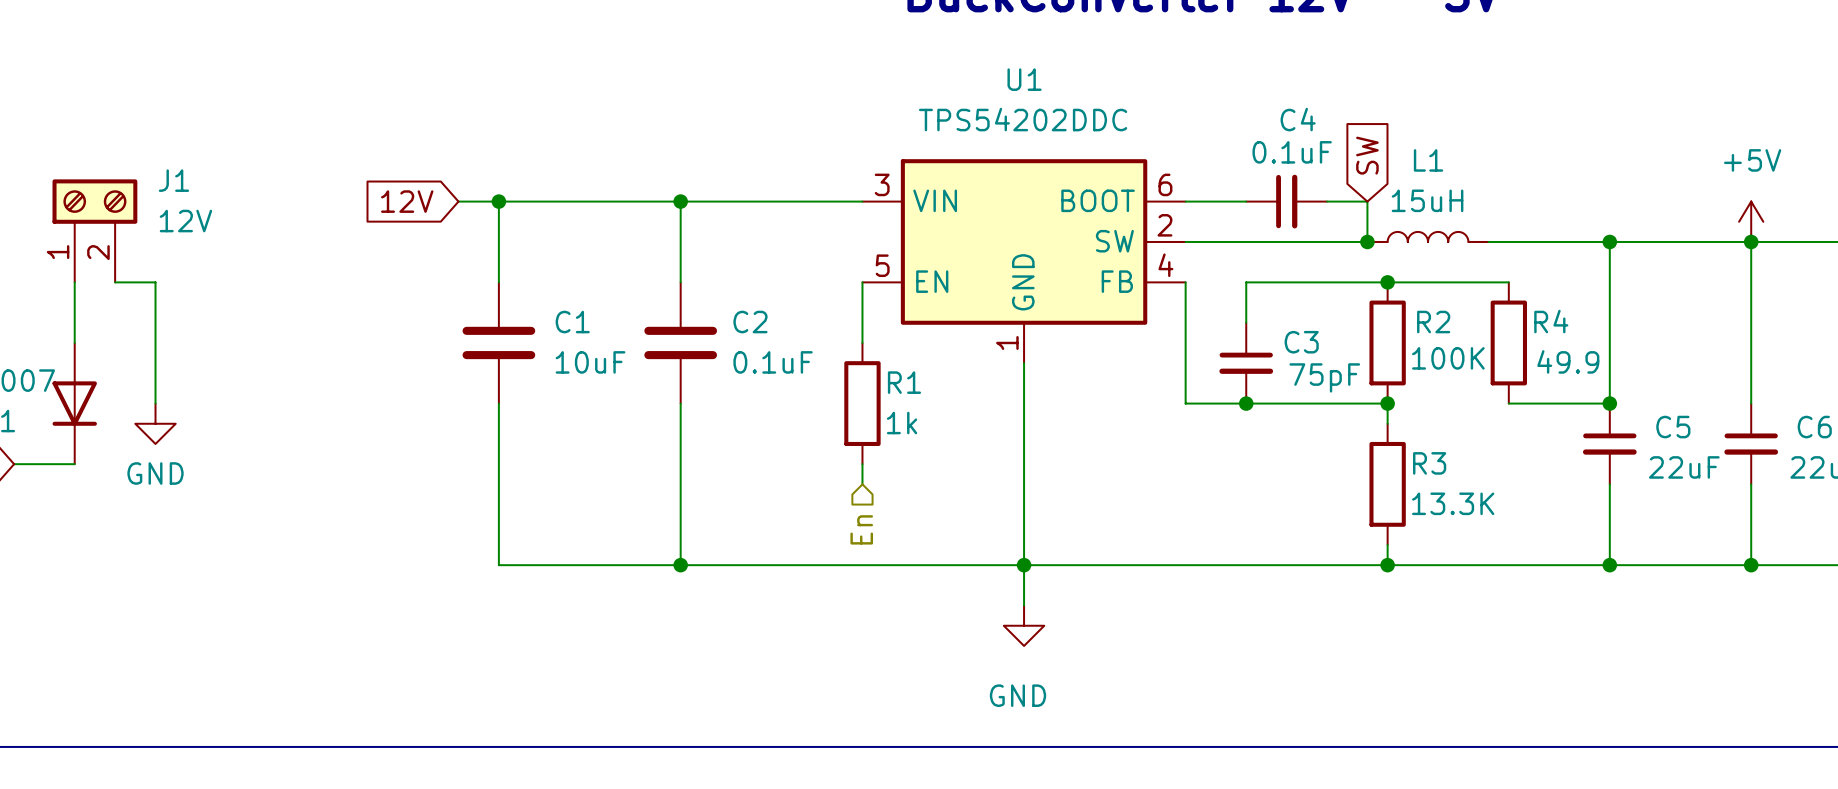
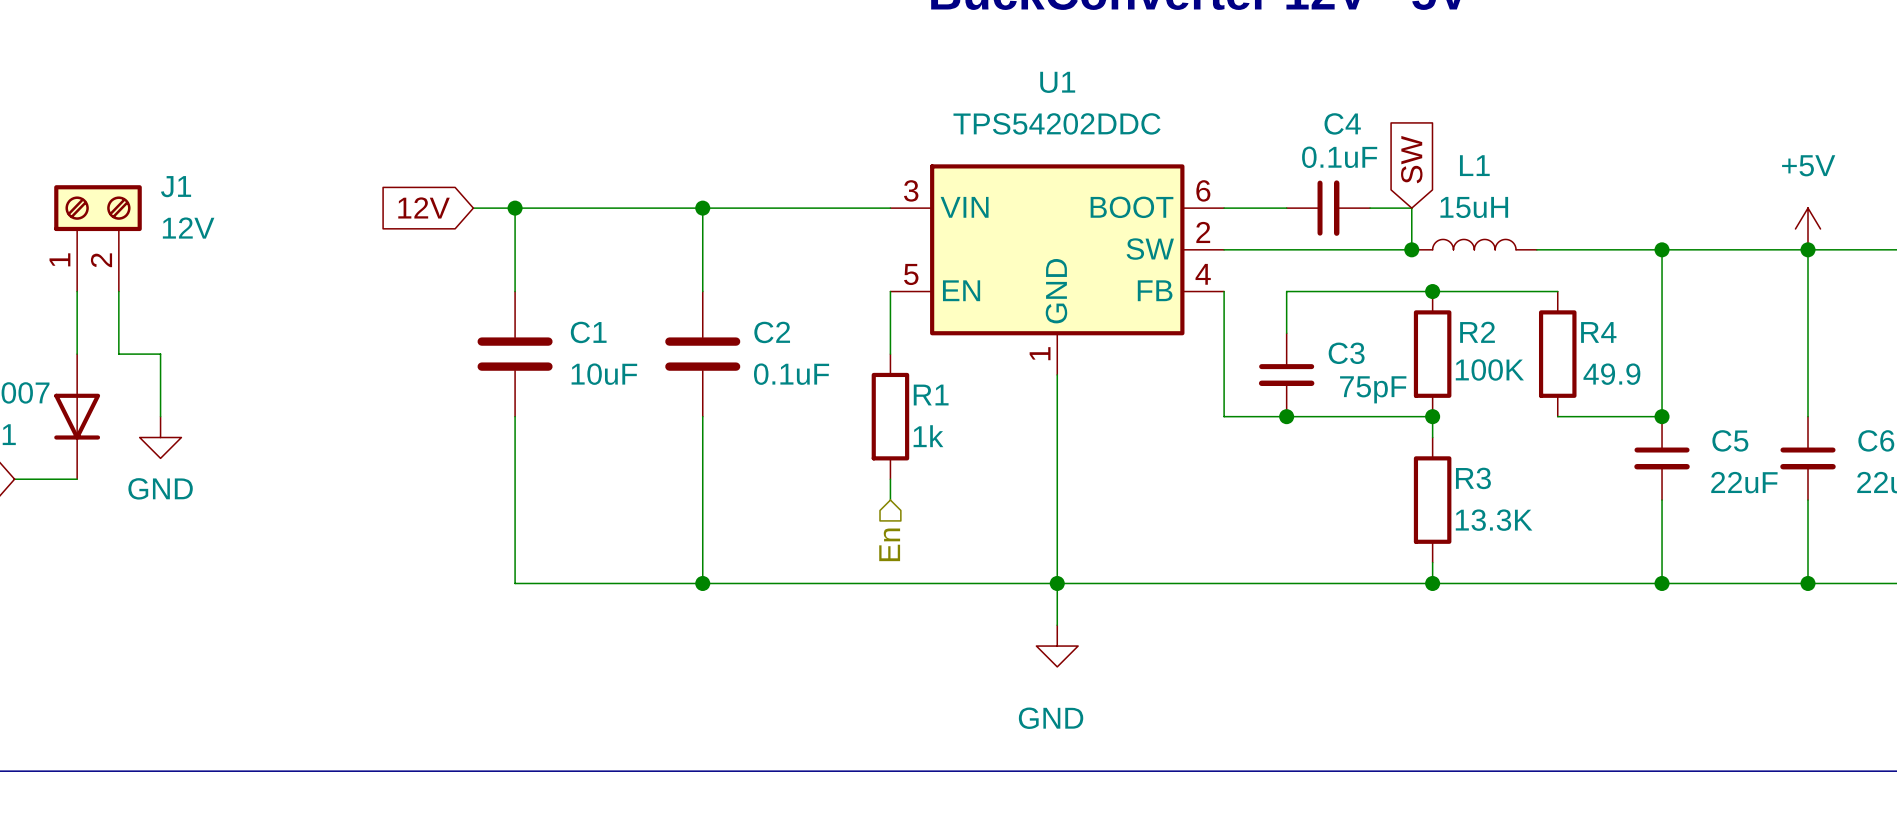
wire: (115, 282) (155, 282) (155, 342) -> (118, 291) (118, 354) (160, 354)

